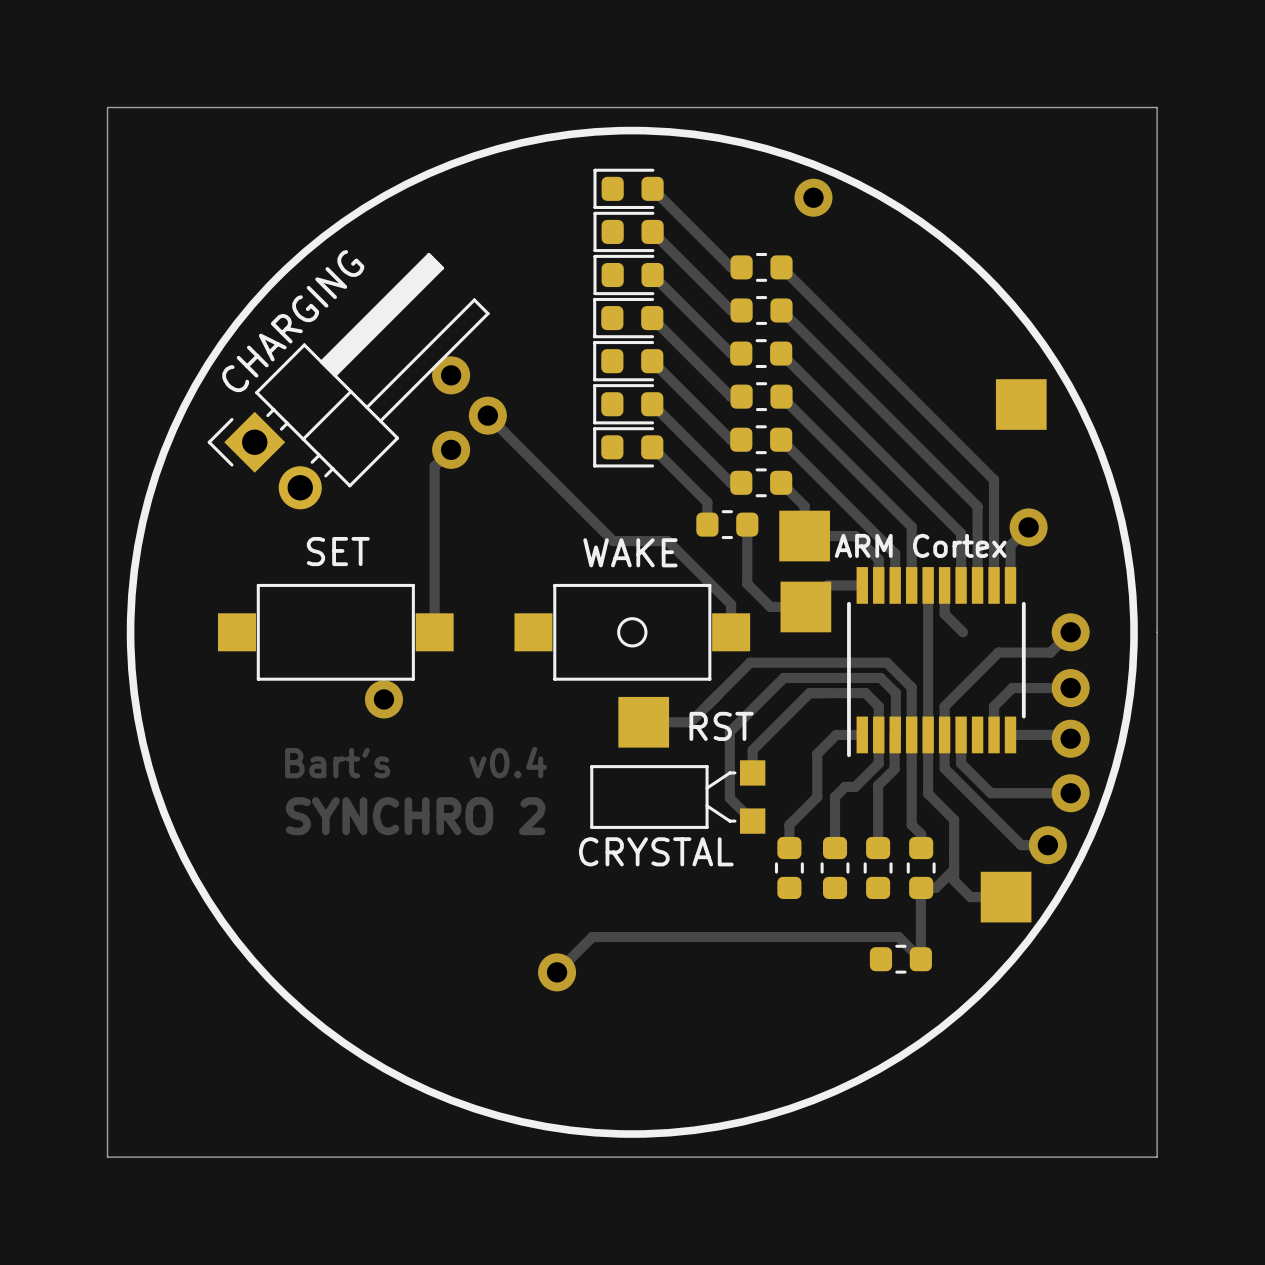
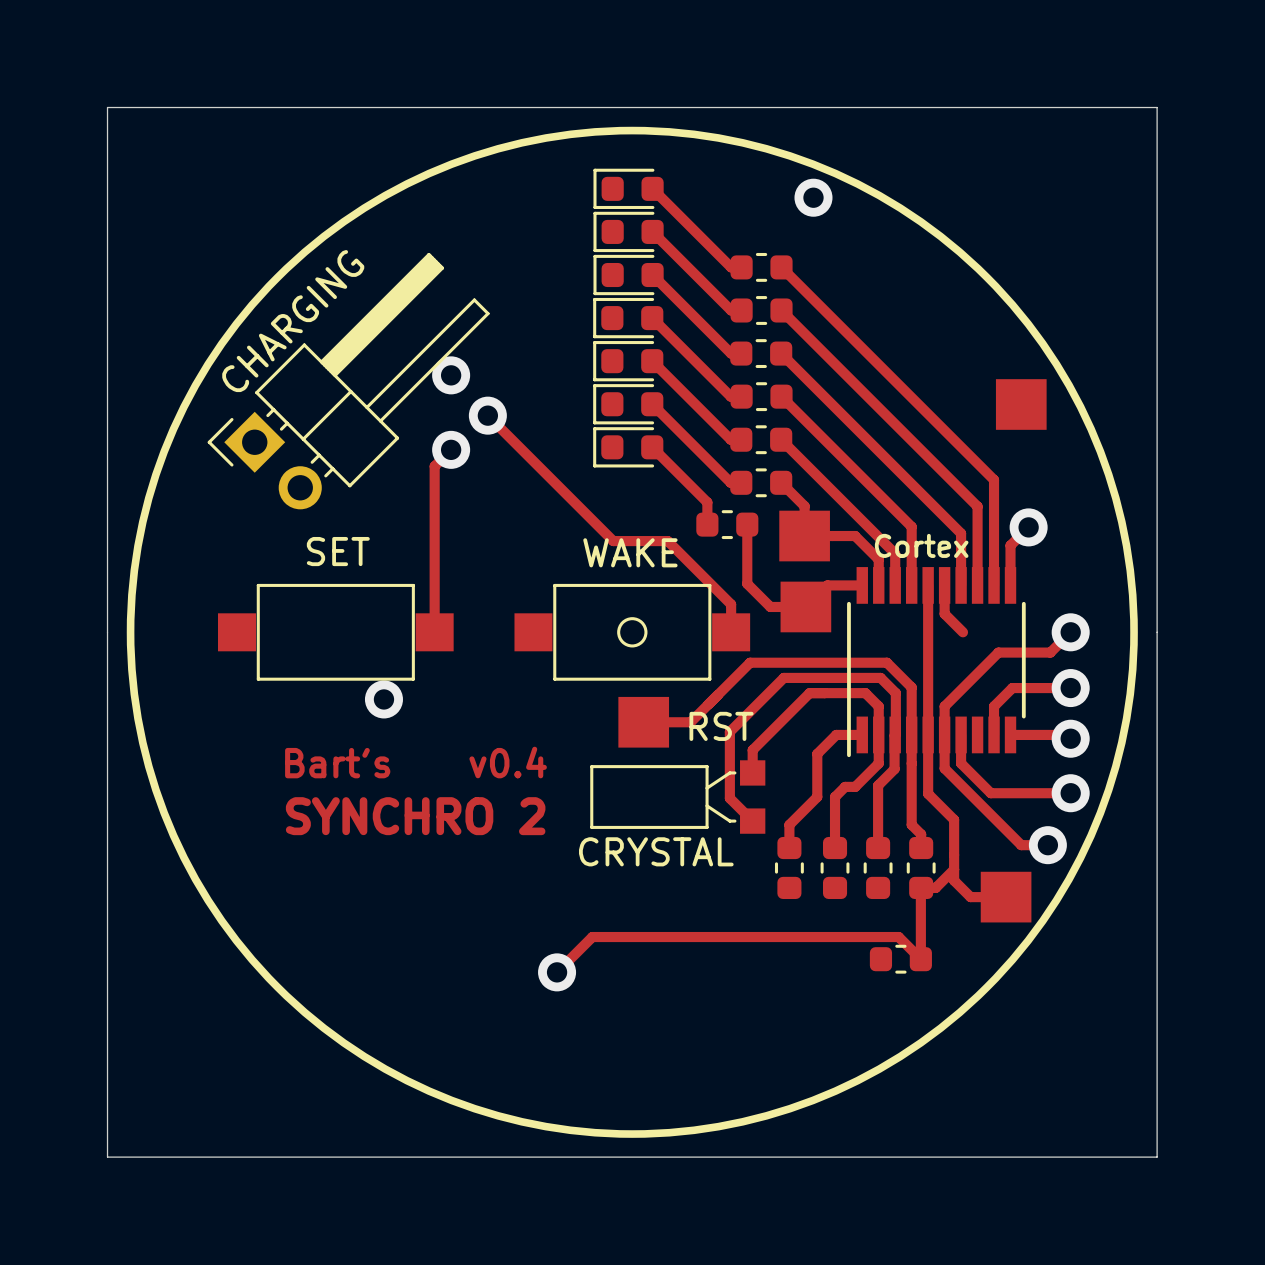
ARM Cortex name: ARM Cortex (920, 545) -> Cortex (921, 545)

